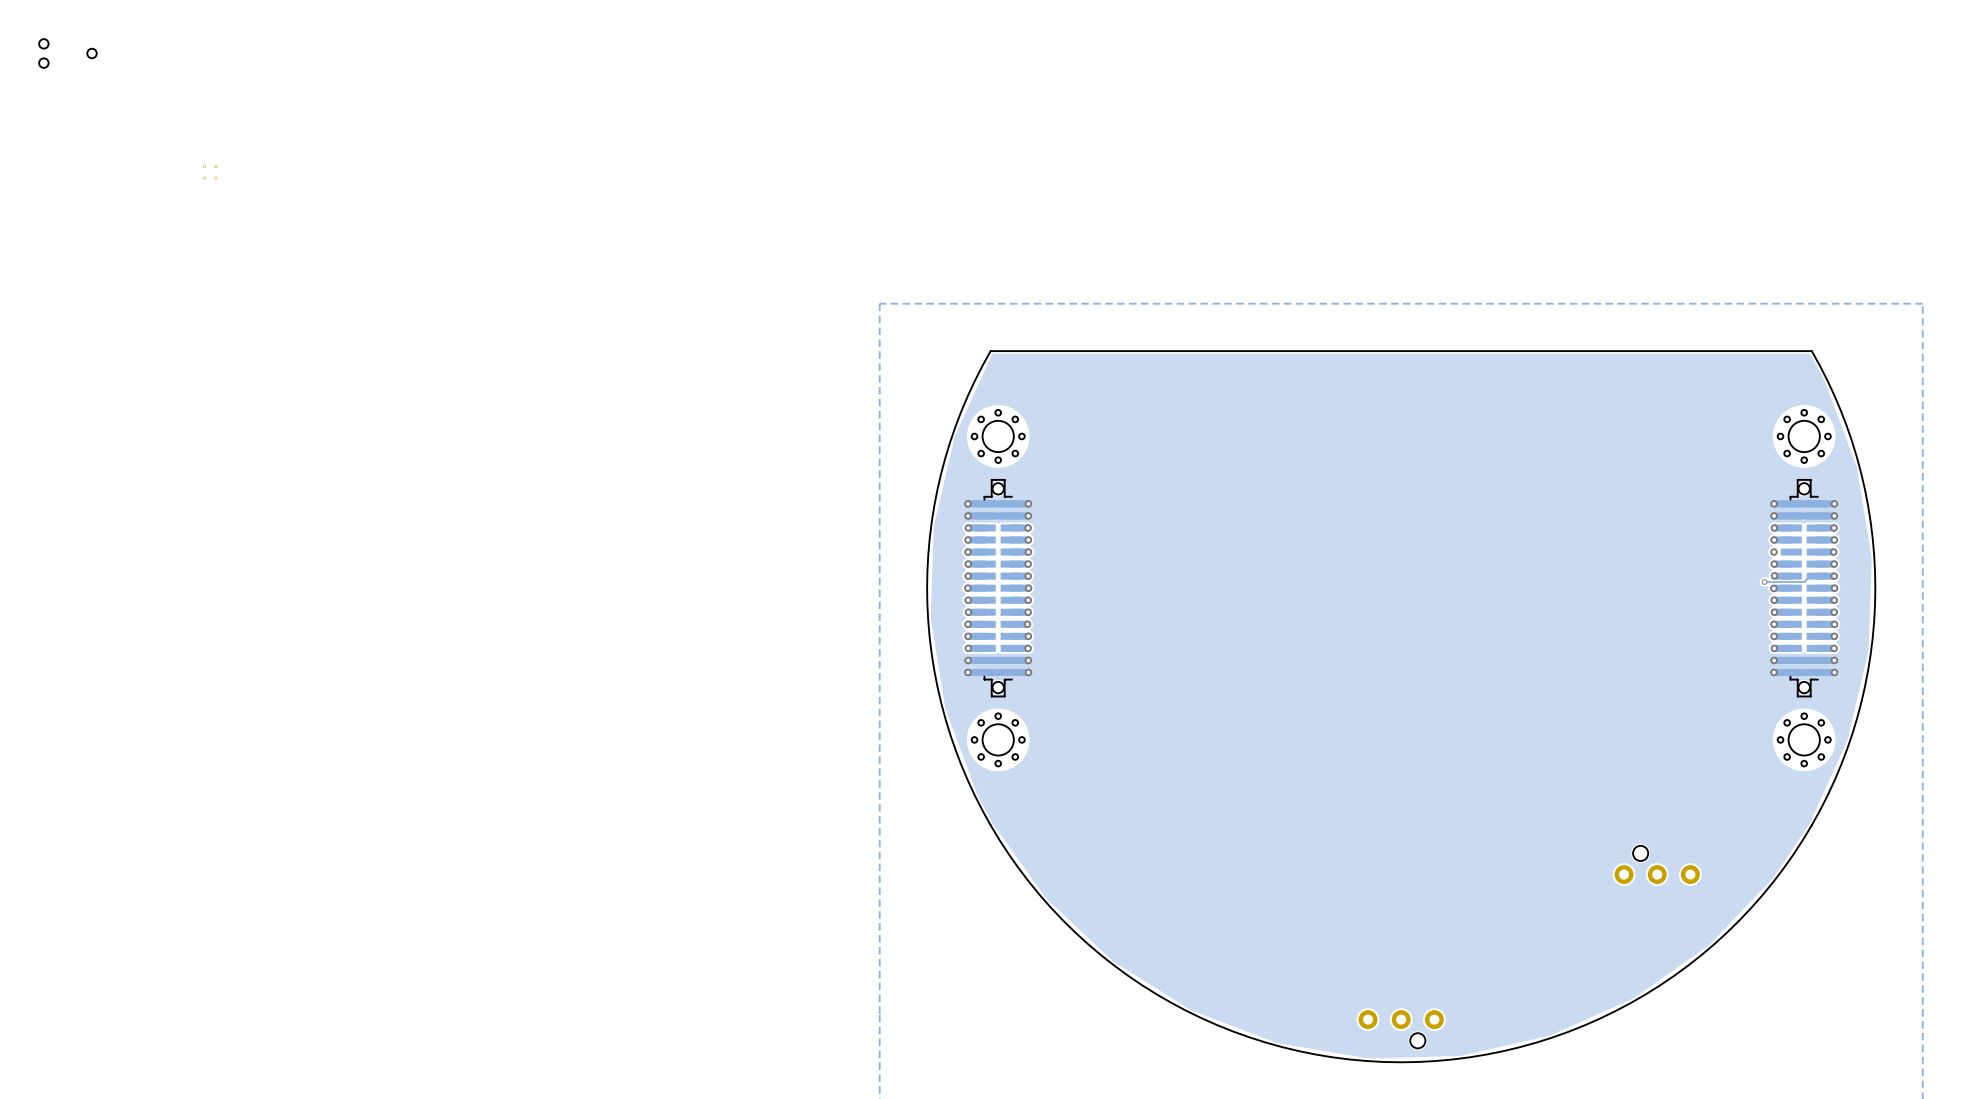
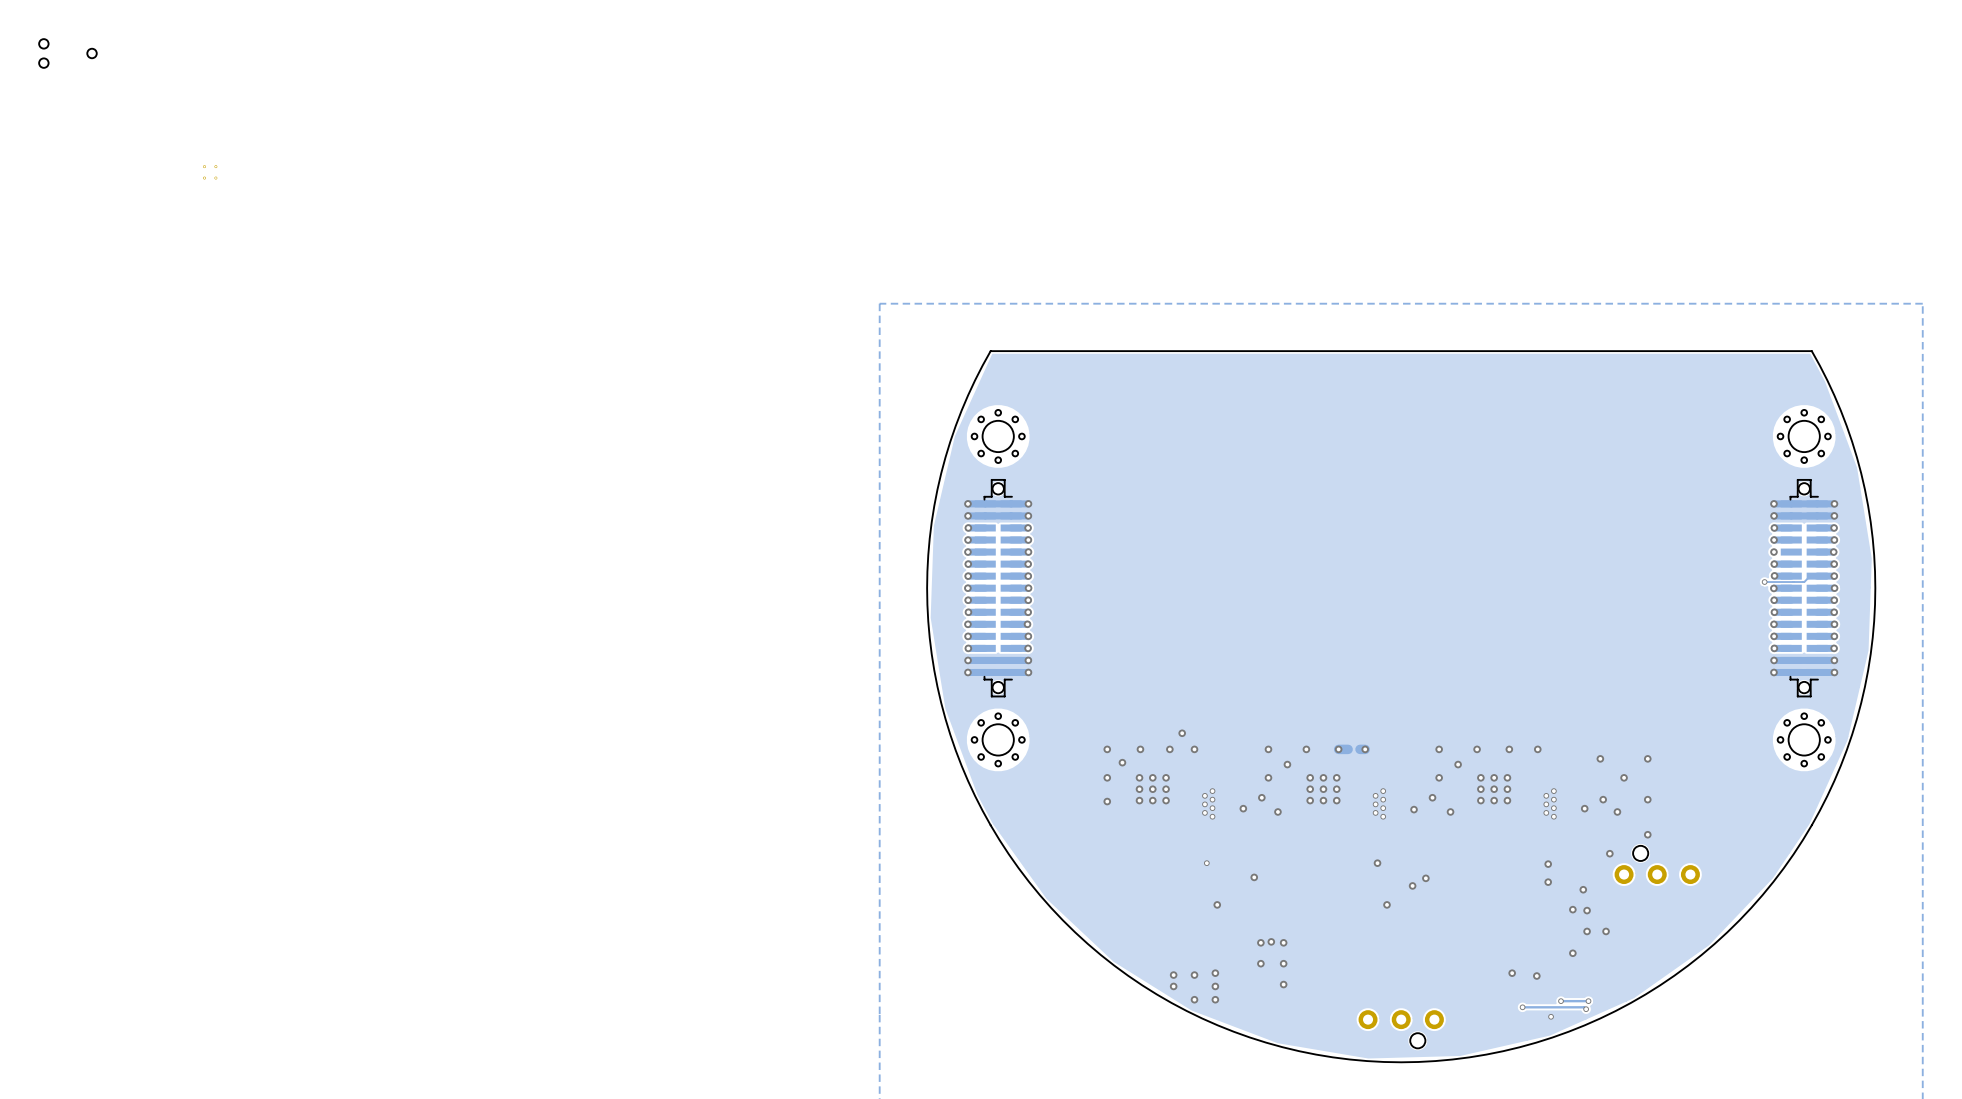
via: none -> (1182, 733)
via: none -> (1107, 749)
via: none -> (1140, 749)
via: none -> (1169, 749)
via: none -> (1194, 749)
via: none -> (1268, 749)
via: none -> (1306, 749)
via: none -> (1338, 749)
track: none -> (1348, 749) (1338, 749)
track: none -> (1365, 749) (1360, 749)
via: none -> (1365, 749)
via: none -> (1439, 749)
via: none -> (1477, 749)
via: none -> (1509, 749)
via: none -> (1537, 749)
via: none -> (1600, 758)
via: none -> (1647, 758)
via: none -> (1122, 762)
via: none -> (1287, 764)
via: none -> (1458, 764)
via: none -> (1107, 777)
via: none -> (1139, 777)
via: none -> (1152, 777)
via: none -> (1166, 777)
via: none -> (1268, 777)
via: none -> (1310, 777)
via: none -> (1323, 777)
via: none -> (1336, 777)
via: none -> (1439, 777)
via: none -> (1480, 777)
via: none -> (1494, 777)
via: none -> (1507, 777)
via: none -> (1624, 777)
via: none -> (1139, 789)
via: none -> (1152, 789)
via: none -> (1166, 789)
via: none -> (1310, 789)
via: none -> (1323, 789)
via: none -> (1336, 789)
via: none -> (1480, 789)
via: none -> (1494, 789)
via: none -> (1507, 789)
via: none -> (1212, 791)
via: none -> (1383, 791)
via: none -> (1553, 791)
via: none -> (1204, 795)
via: none -> (1375, 795)
via: none -> (1546, 795)
via: none -> (1261, 797)
via: none -> (1432, 797)
via: none -> (1212, 799)
via: none -> (1383, 799)
via: none -> (1553, 799)
via: none -> (1603, 799)
via: none -> (1647, 799)
via: none -> (1139, 800)
via: none -> (1152, 800)
via: none -> (1166, 800)
via: none -> (1310, 800)
via: none -> (1323, 800)
via: none -> (1336, 800)
via: none -> (1480, 800)
via: none -> (1494, 800)
via: none -> (1507, 800)
via: none -> (1107, 801)
via: none -> (1204, 804)
via: none -> (1375, 804)
via: none -> (1546, 804)
via: none -> (1212, 808)
via: none -> (1243, 808)
via: none -> (1383, 808)
via: none -> (1553, 808)
via: none -> (1584, 808)
via: none -> (1414, 809)
via: none -> (1277, 811)
via: none -> (1450, 811)
via: none -> (1617, 811)
via: none -> (1204, 812)
via: none -> (1375, 812)
via: none -> (1546, 812)
via: none -> (1212, 816)
via: none -> (1383, 816)
via: none -> (1553, 816)
via: none -> (1647, 834)
via: none -> (1609, 853)
via: none -> (1206, 863)
via: none -> (1377, 863)
via: none -> (1548, 864)
via: none -> (1254, 877)
via: none -> (1425, 878)
via: none -> (1548, 882)
via: none -> (1412, 885)
via: none -> (1583, 889)
via: none -> (1217, 904)
via: none -> (1387, 904)
via: none -> (1572, 909)
via: none -> (1587, 910)
via: none -> (1587, 931)
via: none -> (1606, 931)
via: none -> (1271, 941)
via: none -> (1260, 942)
via: none -> (1283, 942)
via: none -> (1572, 953)
via: none -> (1260, 963)
via: none -> (1283, 963)
via: none -> (1215, 973)
via: none -> (1512, 973)
via: none -> (1173, 975)
via: none -> (1194, 975)
via: none -> (1536, 976)
via: none -> (1283, 984)
via: none -> (1173, 986)
via: none -> (1215, 986)
via: none -> (1194, 999)
via: none -> (1215, 999)
via: none -> (1561, 1001)
track: none -> (1588, 1001) (1561, 1001)
via: none -> (1588, 1001)
track: none -> (1522, 1007) (1584, 1007) (1586, 1009)
via: none -> (1522, 1007)
via: none -> (1586, 1009)
via: none -> (1551, 1016)

